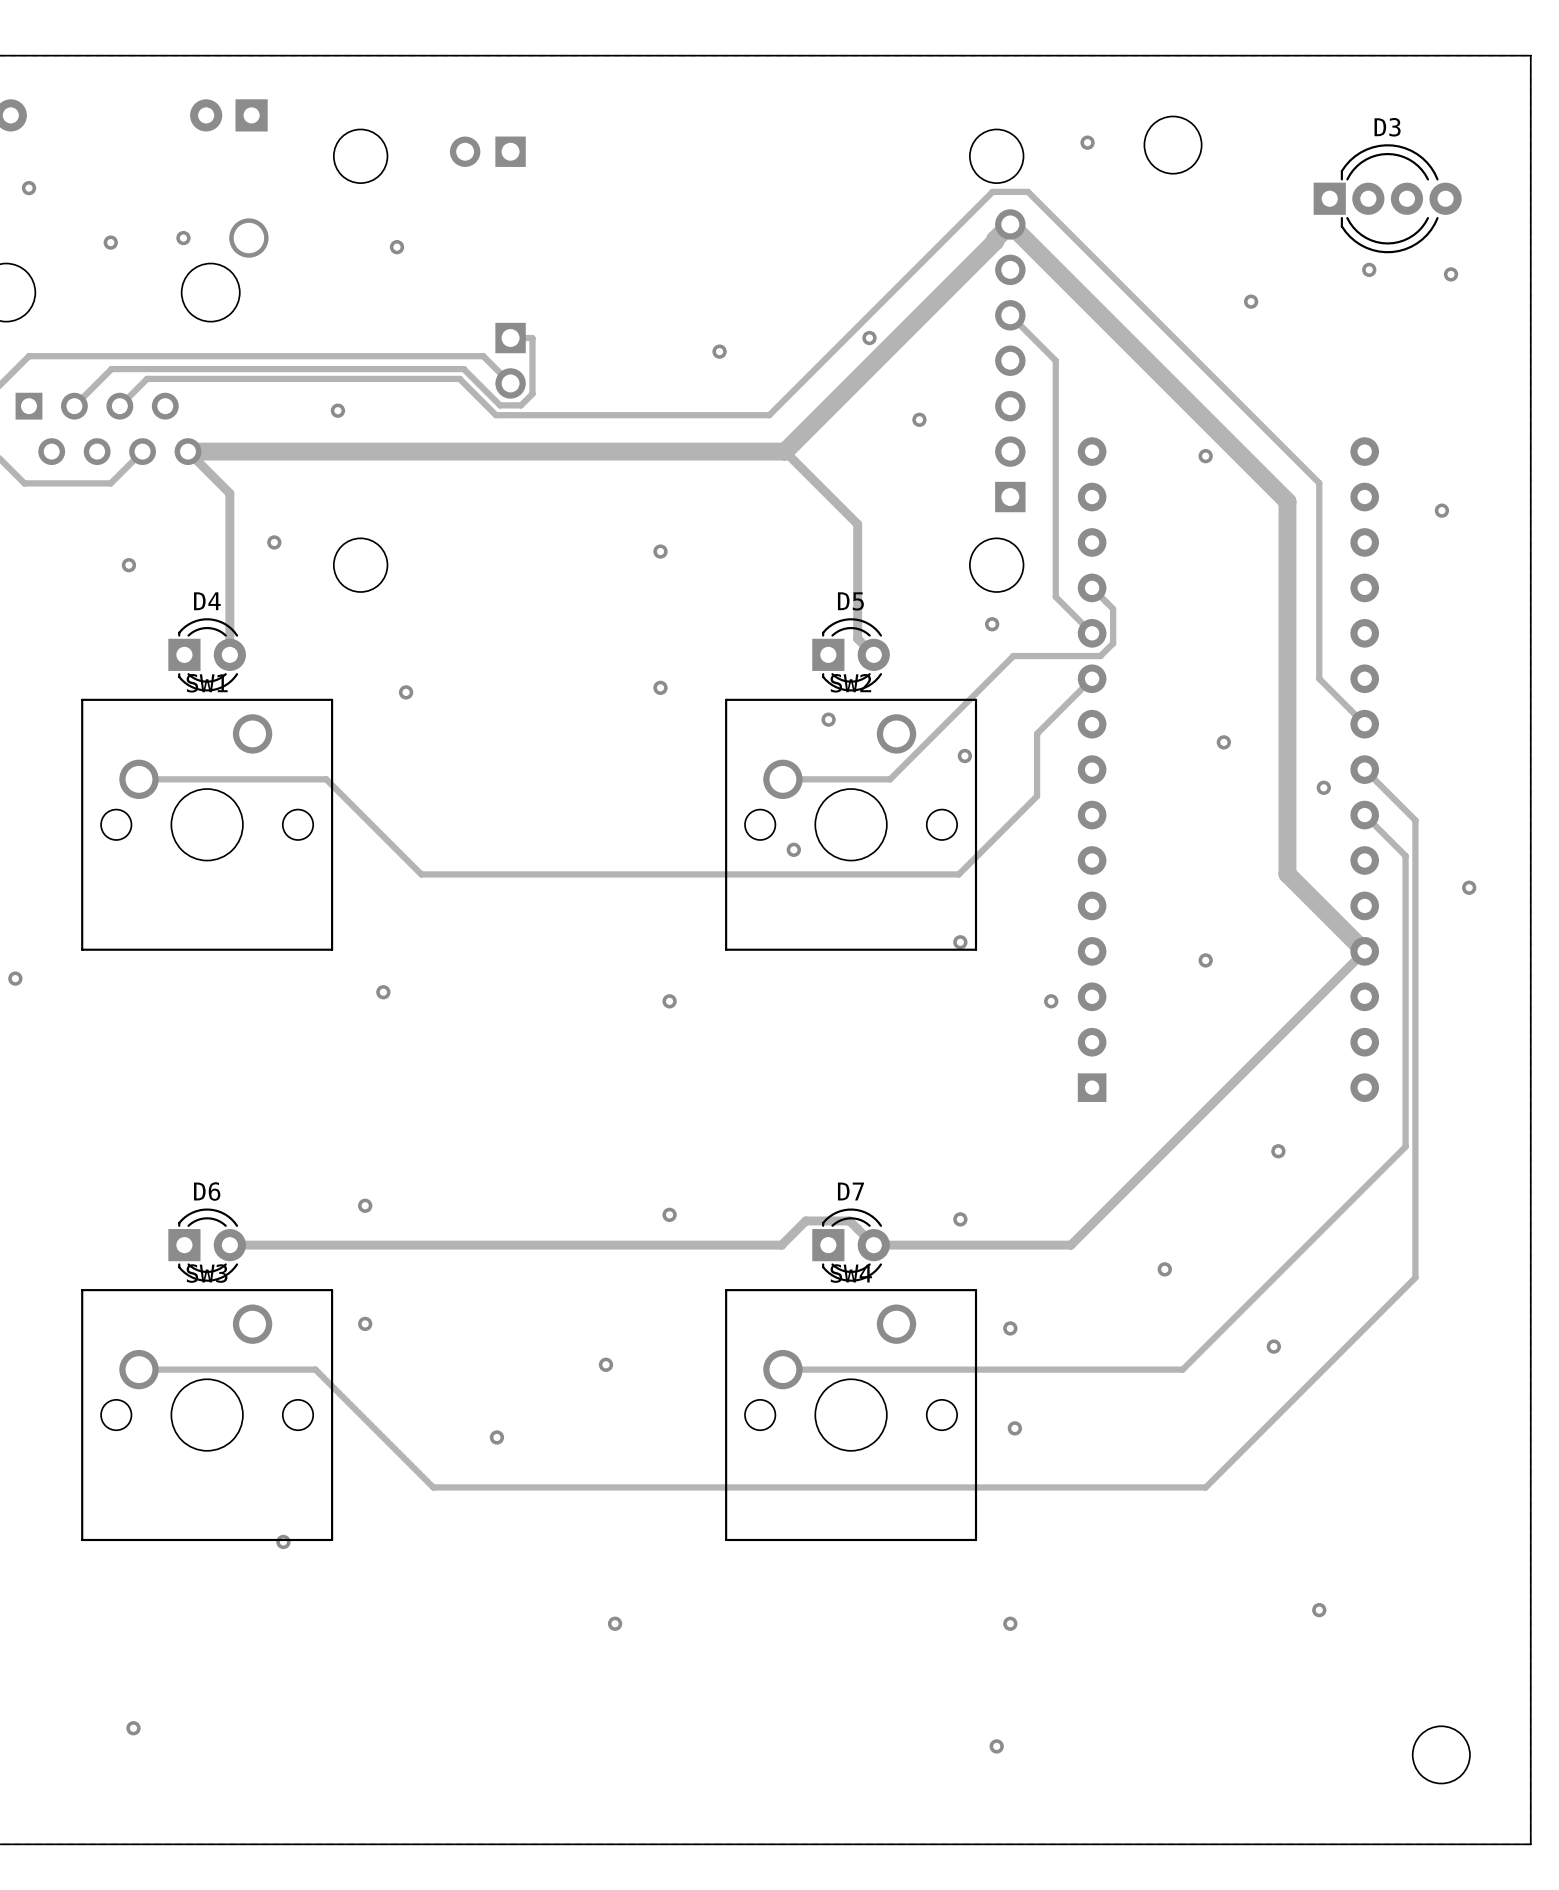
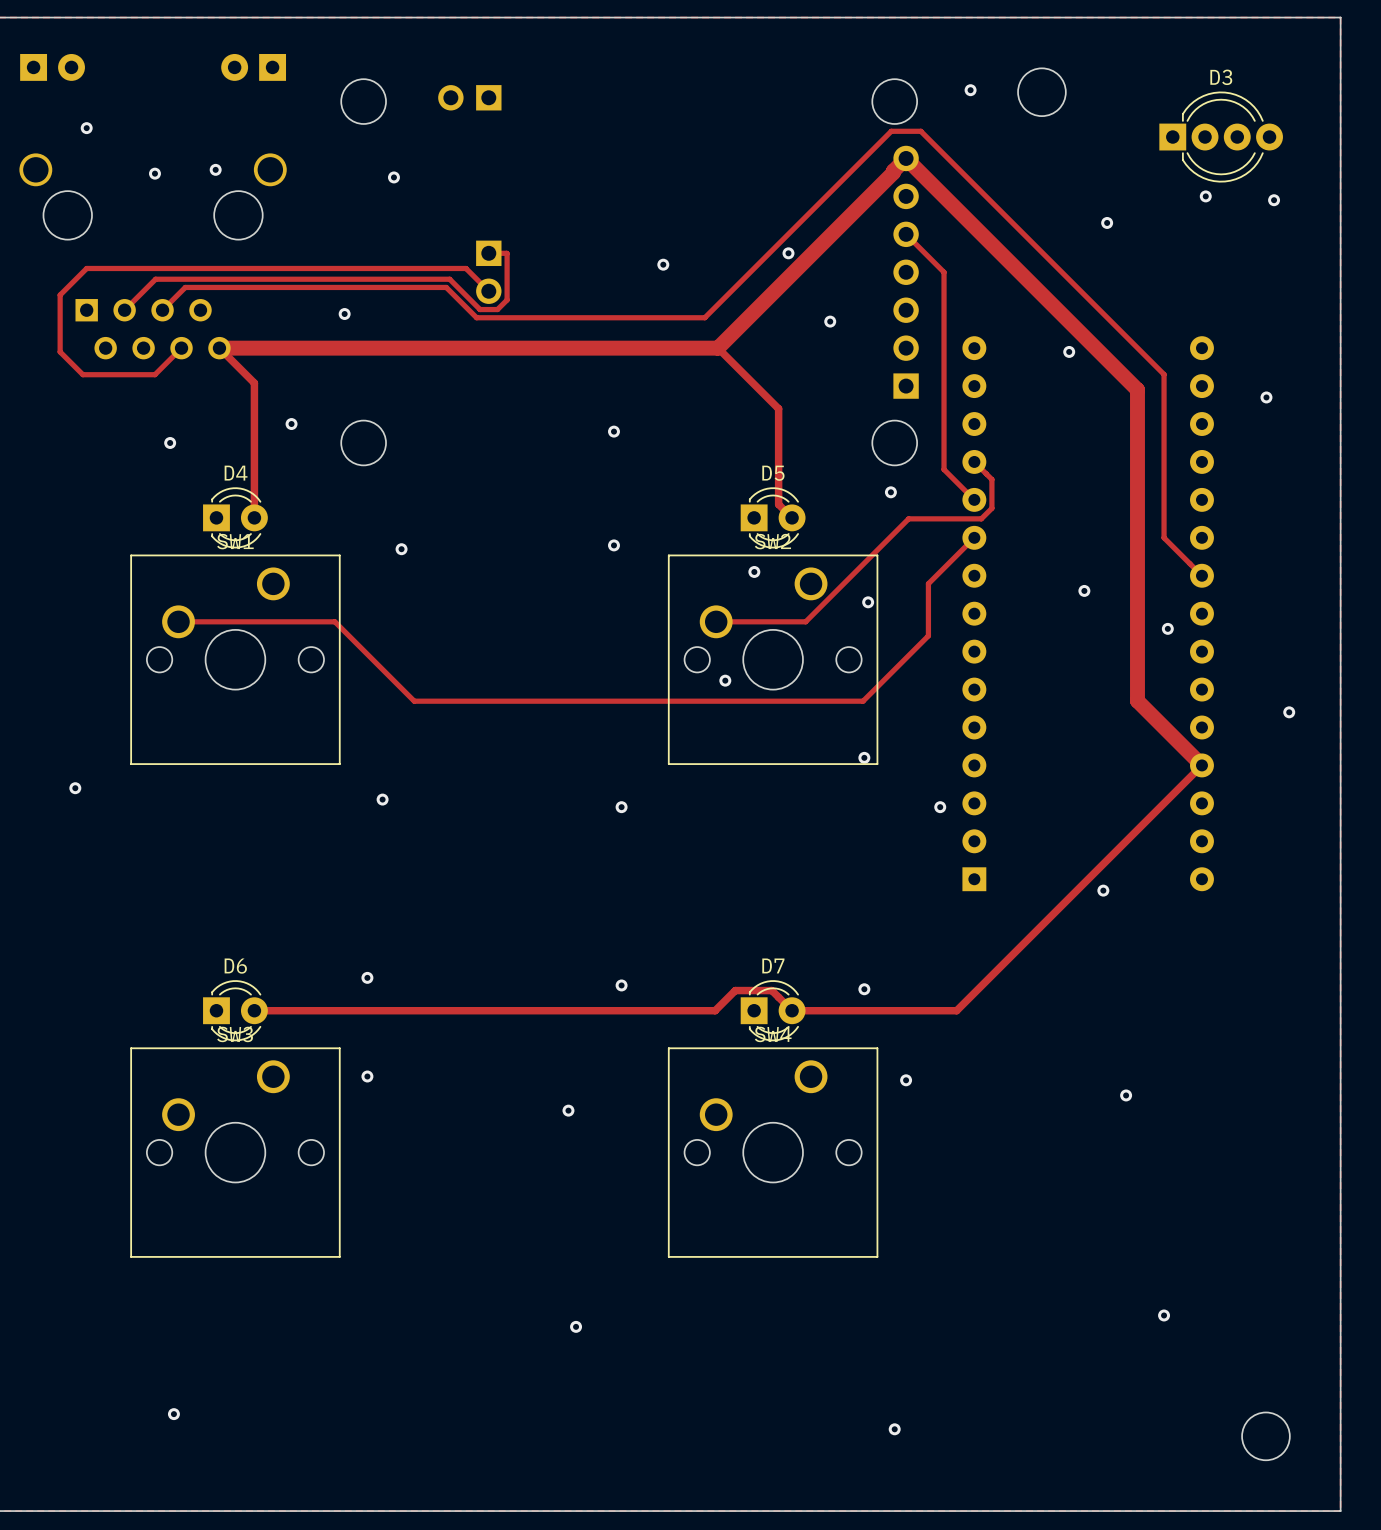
track: (1364, 769) (1415, 820) (1415, 1277) (1205, 1487) (433, 1487) (315, 1369) (138, 1369) -> none
track: (1364, 815) (1405, 855) (1405, 1146) (1182, 1369) (782, 1369) -> none
via: (1205, 960) -> none
via position: (1278, 1151) -> (1103, 890)
via: (1164, 1269) -> none
via: (1014, 1428) -> none
via: (496, 1437) -> none
via: (283, 1541) -> none
via: (1010, 1623) -> none

